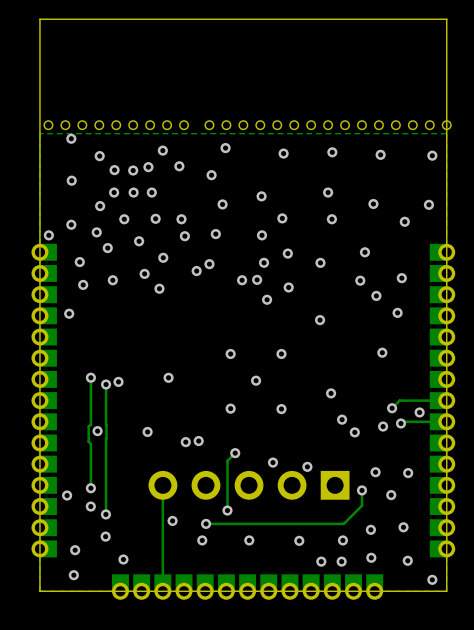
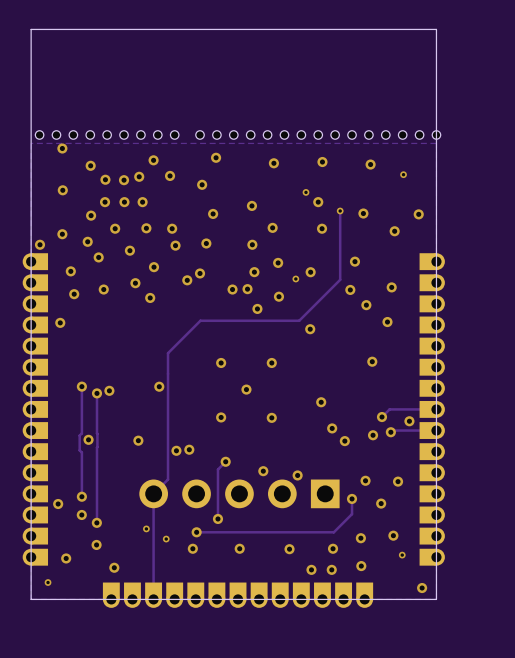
via: (432, 155) -> none
via: none -> (403, 174)
via: none -> (306, 192)
track: none -> (340, 210) (340, 279) (299, 320) (200, 320) (168, 353) (168, 479) (153, 493)
via: none -> (340, 210)
via: none -> (295, 278)
via: none -> (146, 528)
via: (172, 520) -> none
via: none -> (166, 539)
via: none -> (402, 555)
via: (407, 560) -> none
via: none -> (48, 582)
via: (73, 575) -> none

